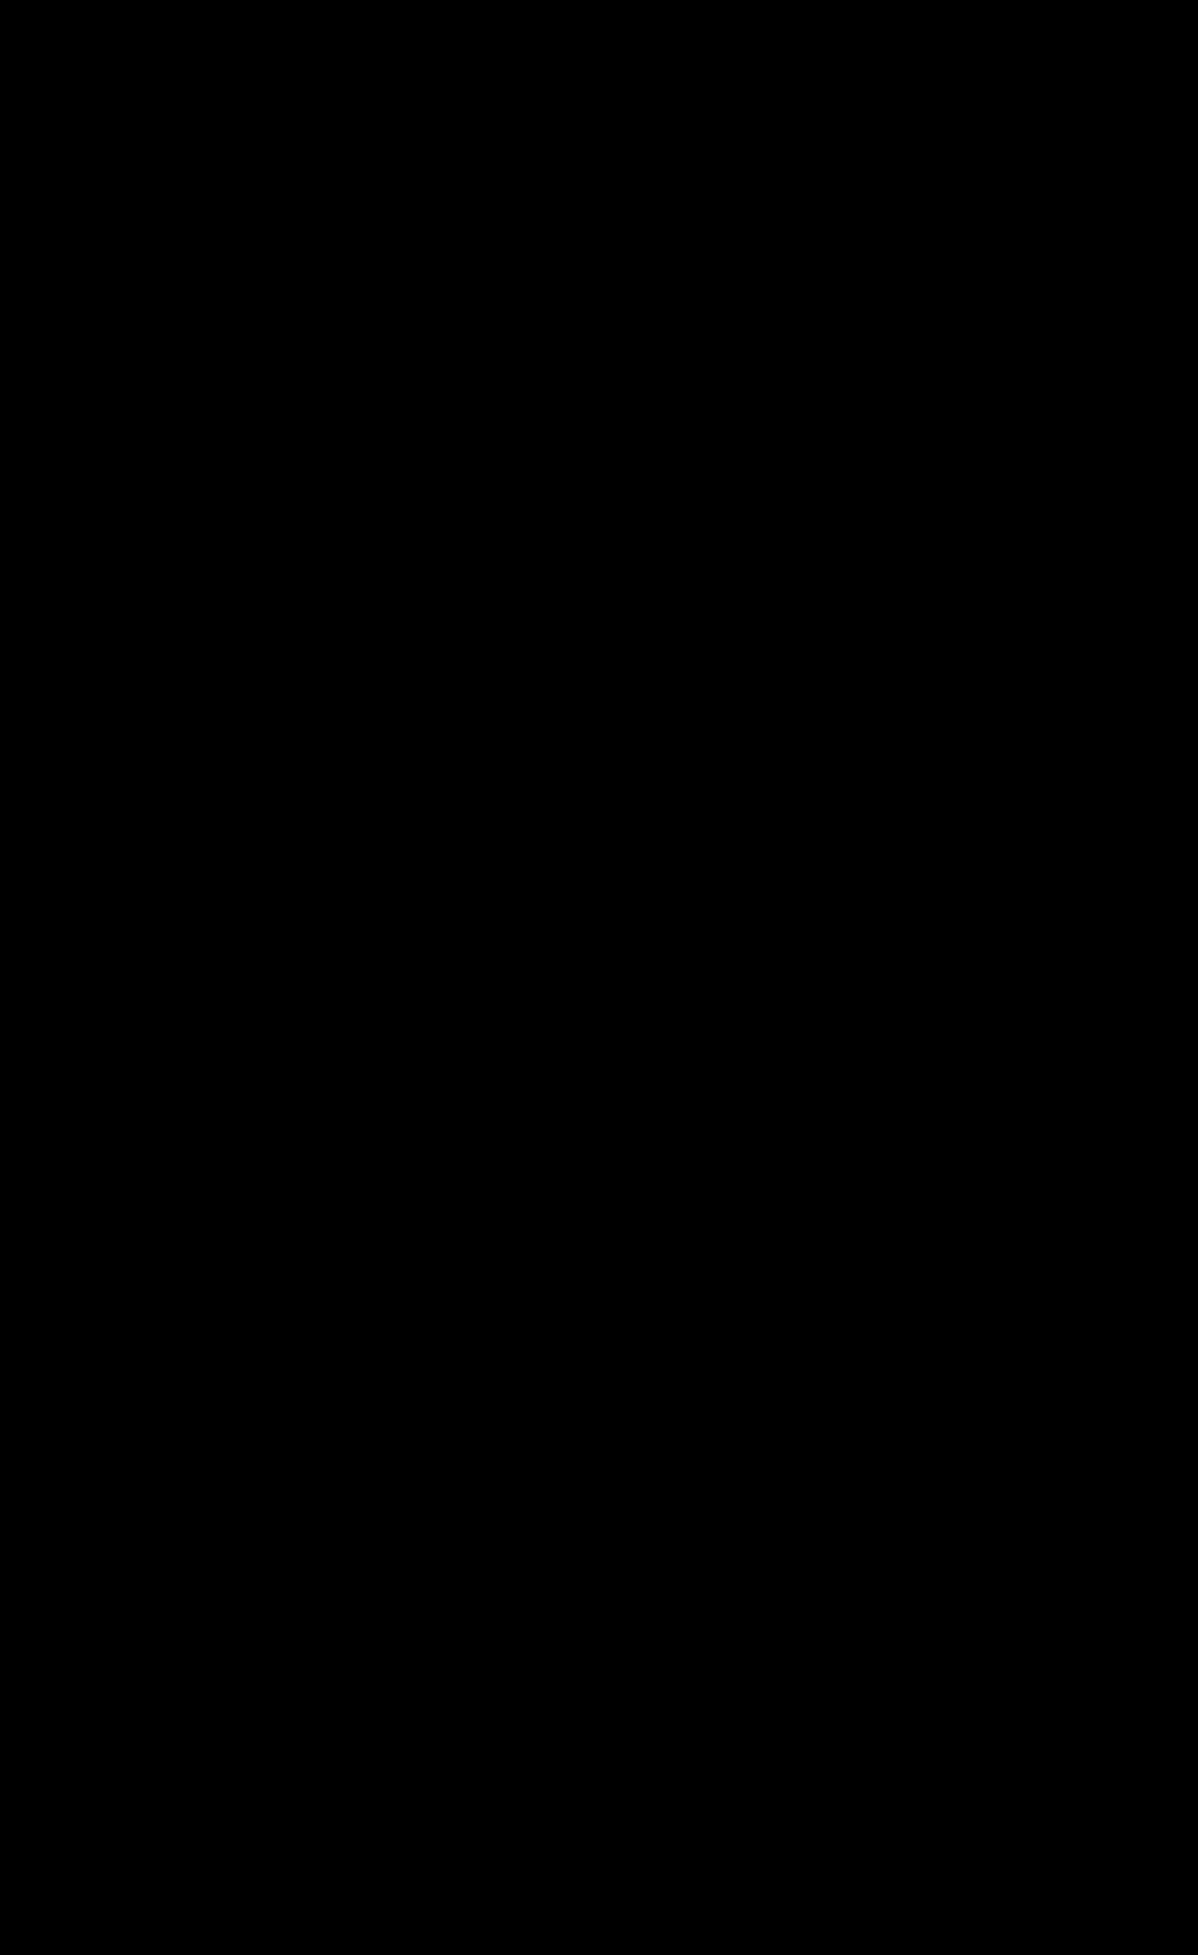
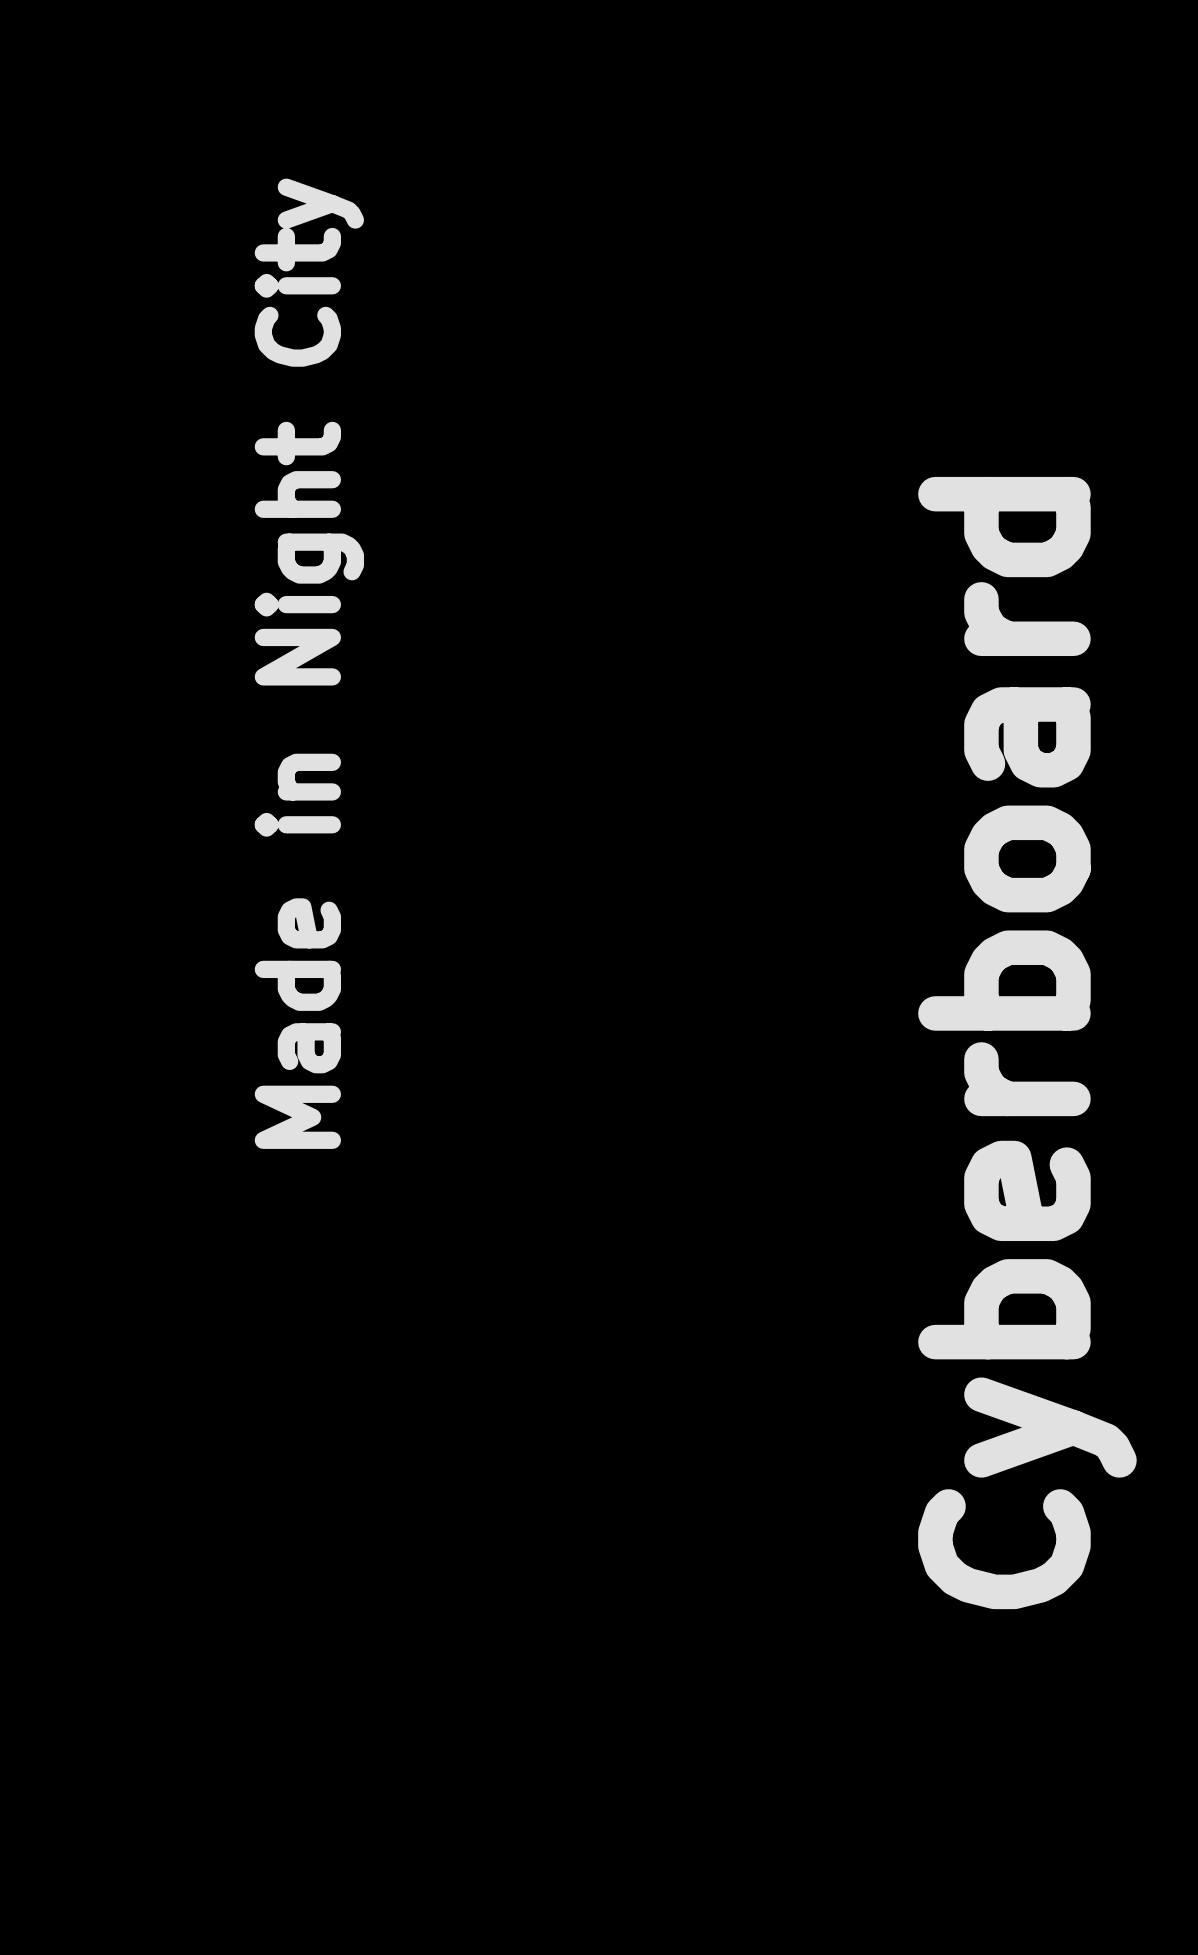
text: none -> Made in Night City (309, 663)
text: none -> Cyberboard (1027, 1043)

